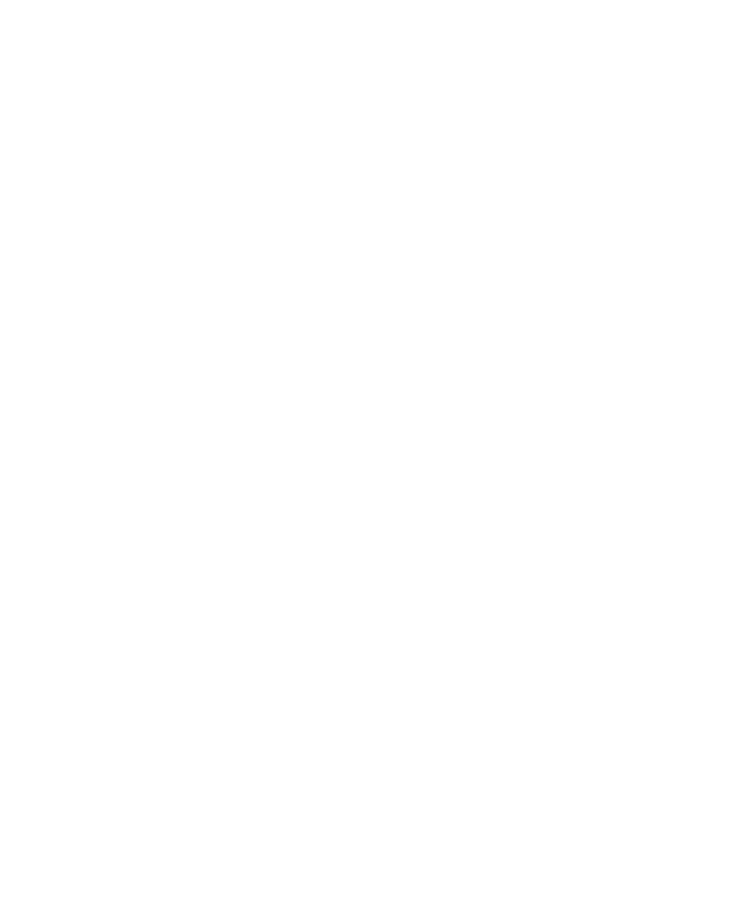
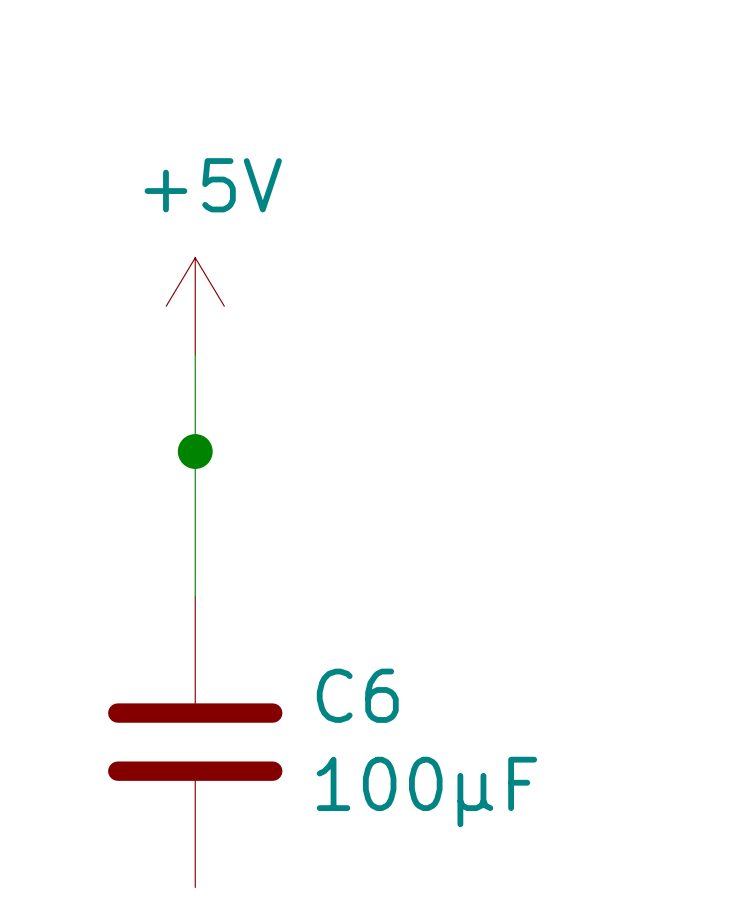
power symbol: none -> +5V (195, 306)
wire: none -> (195, 354) (195, 596)
junction: none -> (195, 451)
C6: none -> 100µF (195, 742)

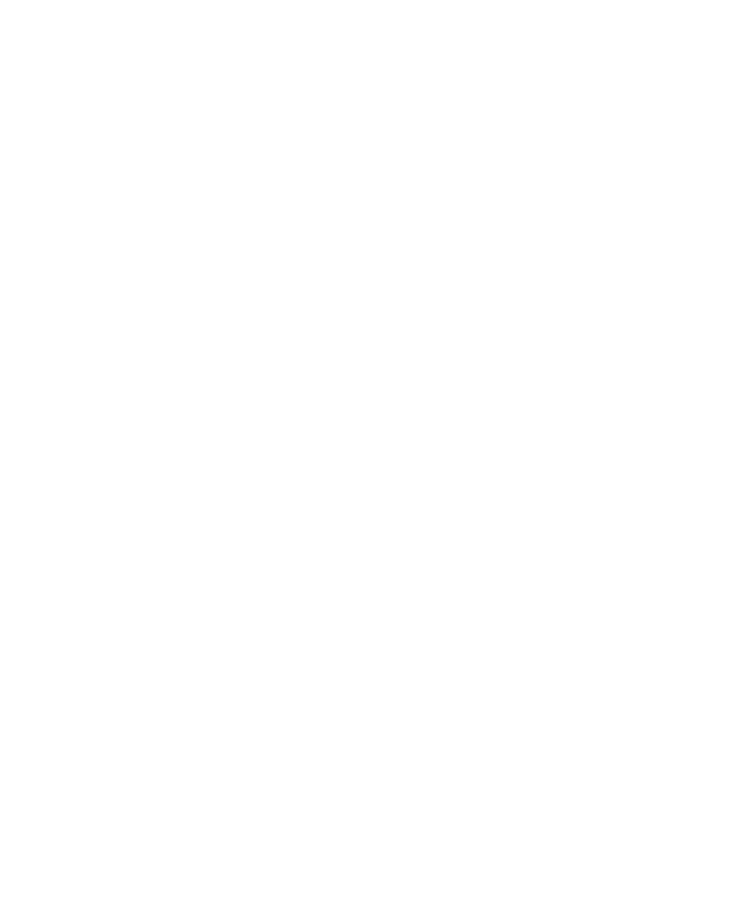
power symbol: +5V (195, 306) -> none
wire: (195, 354) (195, 596) -> none
junction: (195, 451) -> none
C6: 100µF (195, 742) -> none

